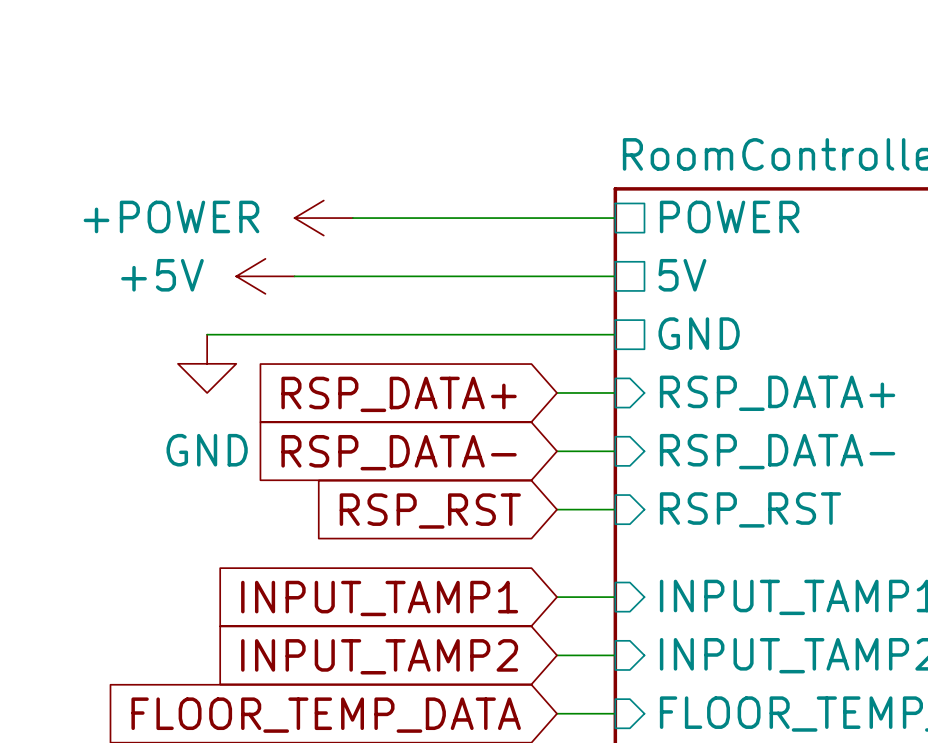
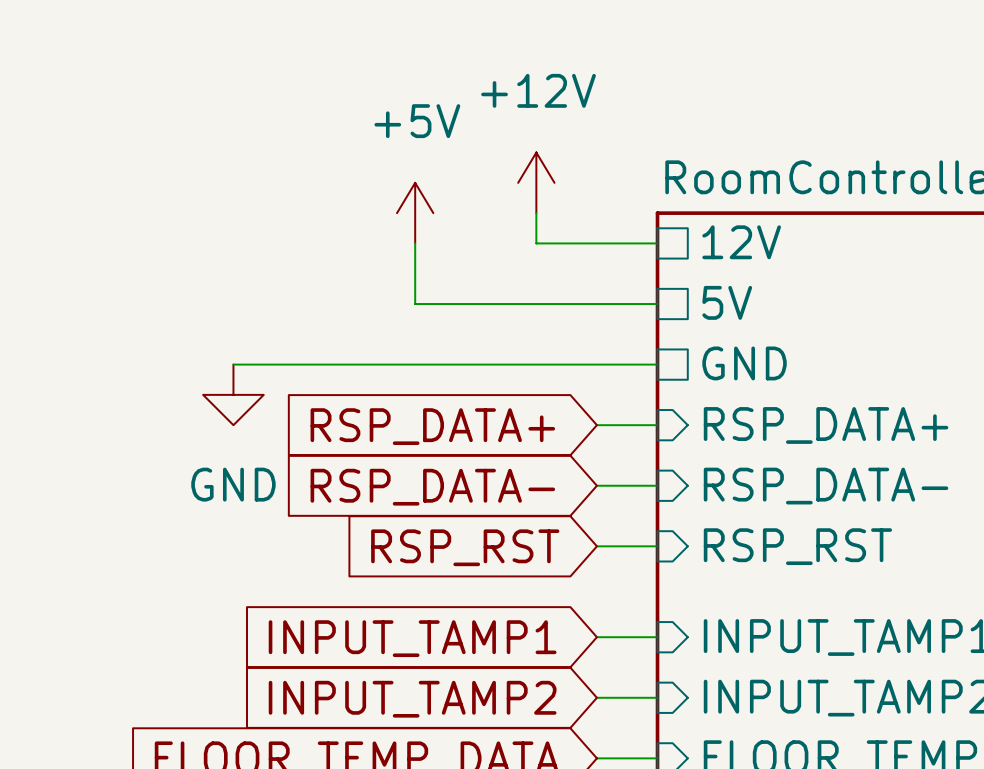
power symbol: none -> +12V (536, 182)
sheet pin: POWER (729, 216) -> 12V (741, 242)
power symbol: +POWER (323, 218) -> none
wire: (352, 218) (498, 218) -> (536, 213) (536, 243)
power symbol rotation: 0° (265, 276) -> 90° clockwise (415, 213)
power symbol position: +5V (265, 276) -> +5V (415, 213)
wire: (294, 276) (382, 276) -> (415, 243) (415, 304)

